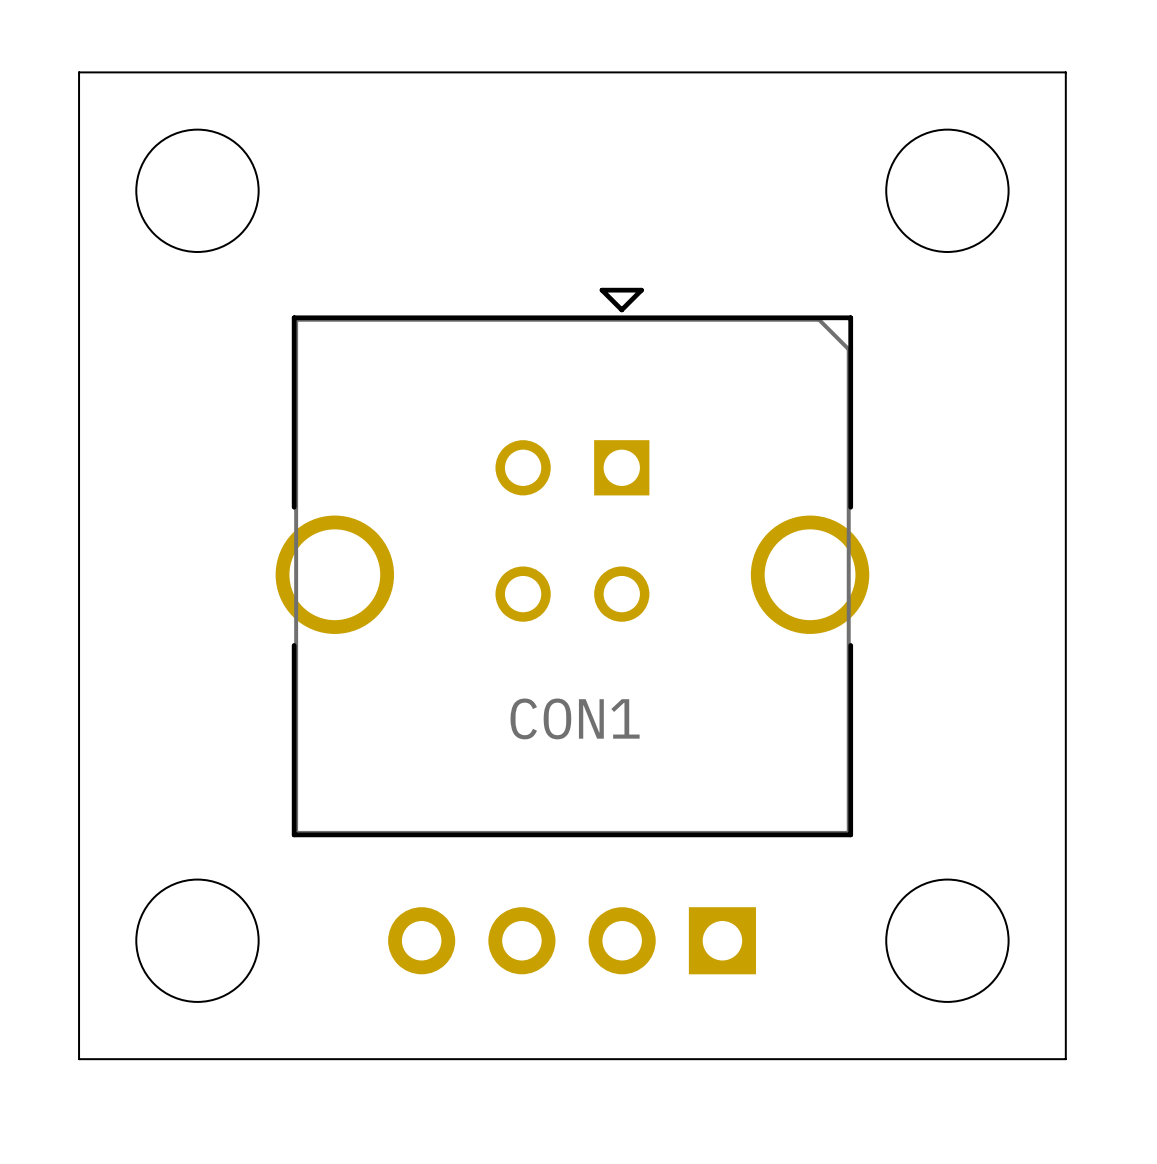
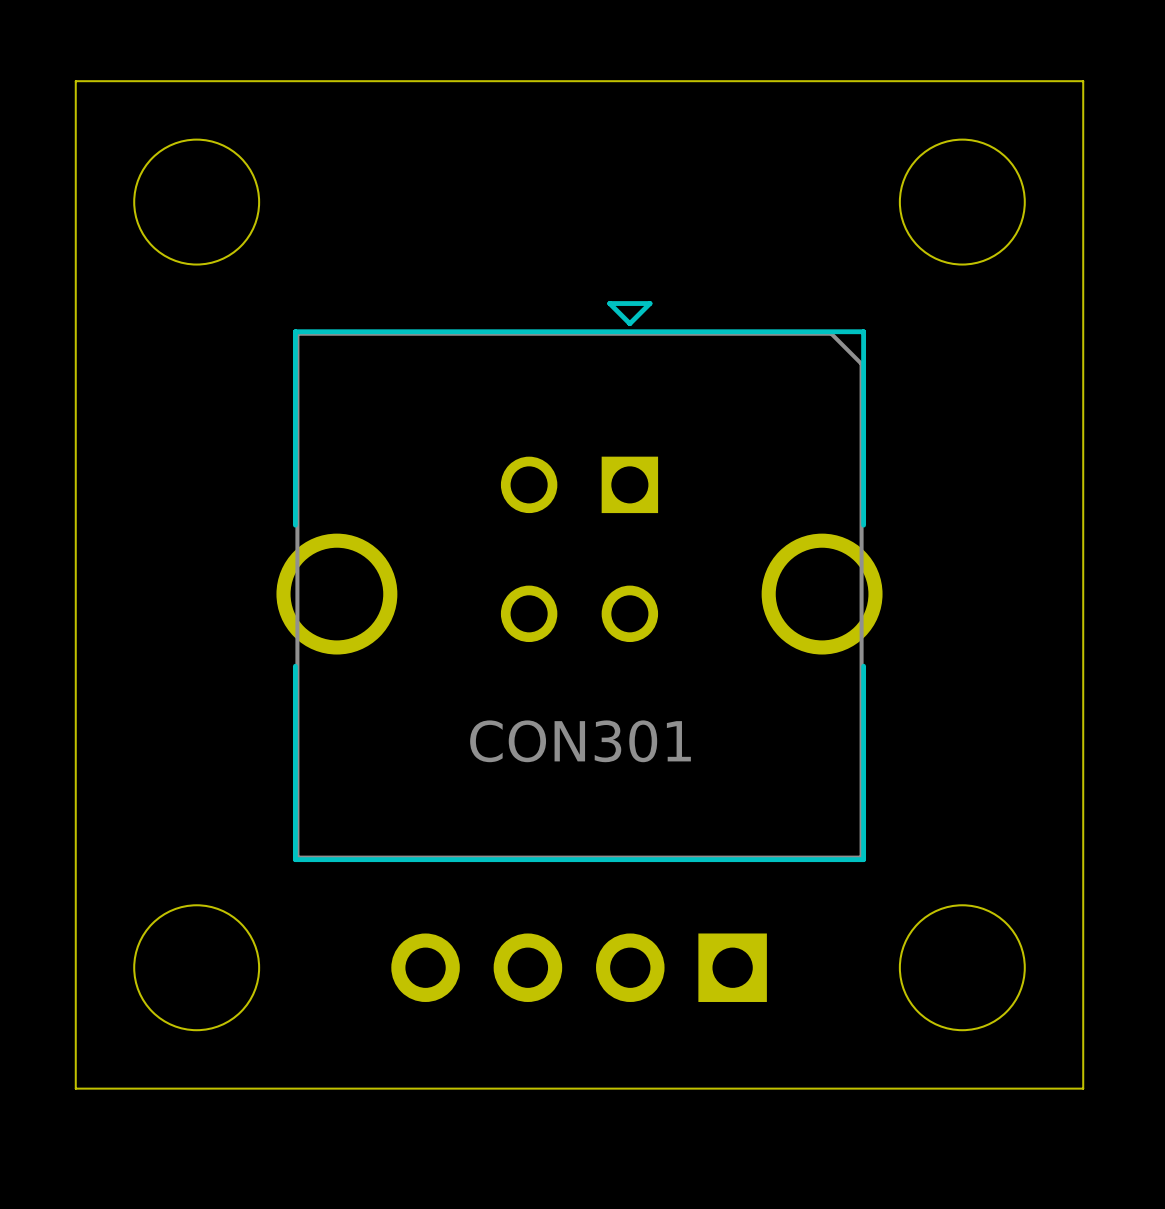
CON1 name: CON1 (575, 718) -> CON301 (580, 741)

